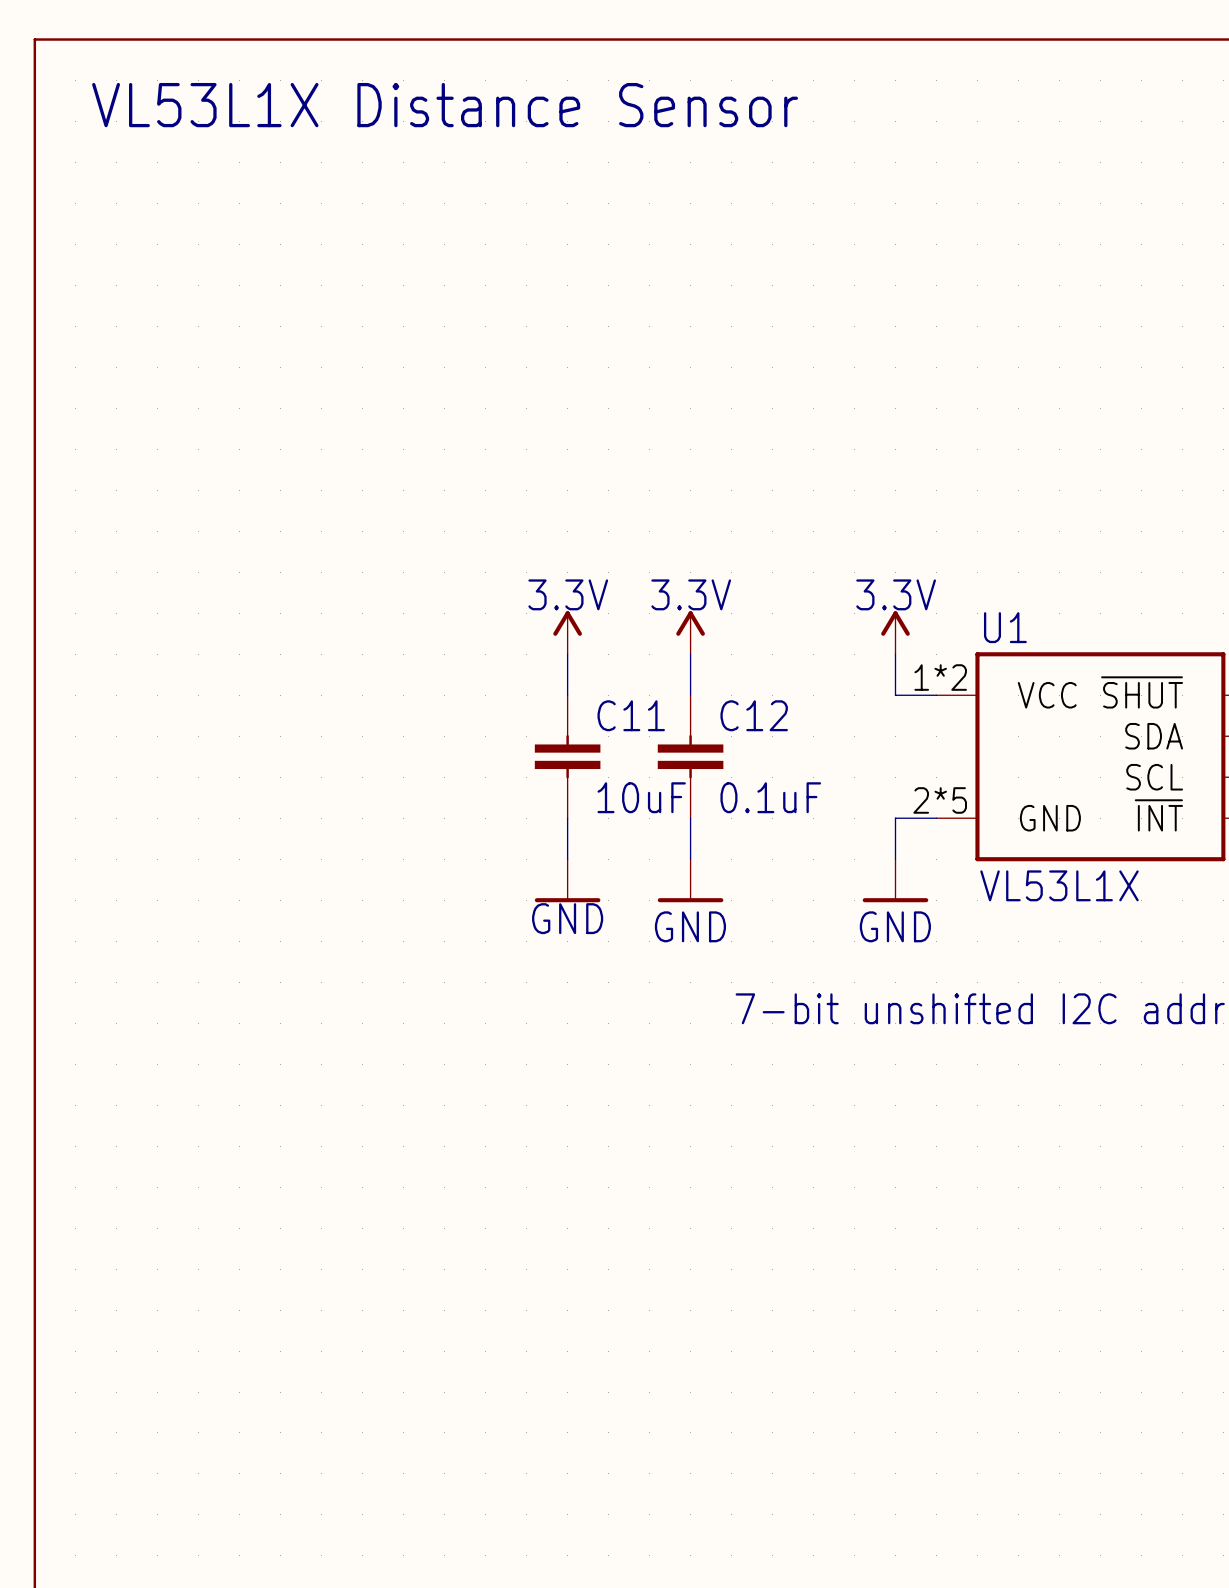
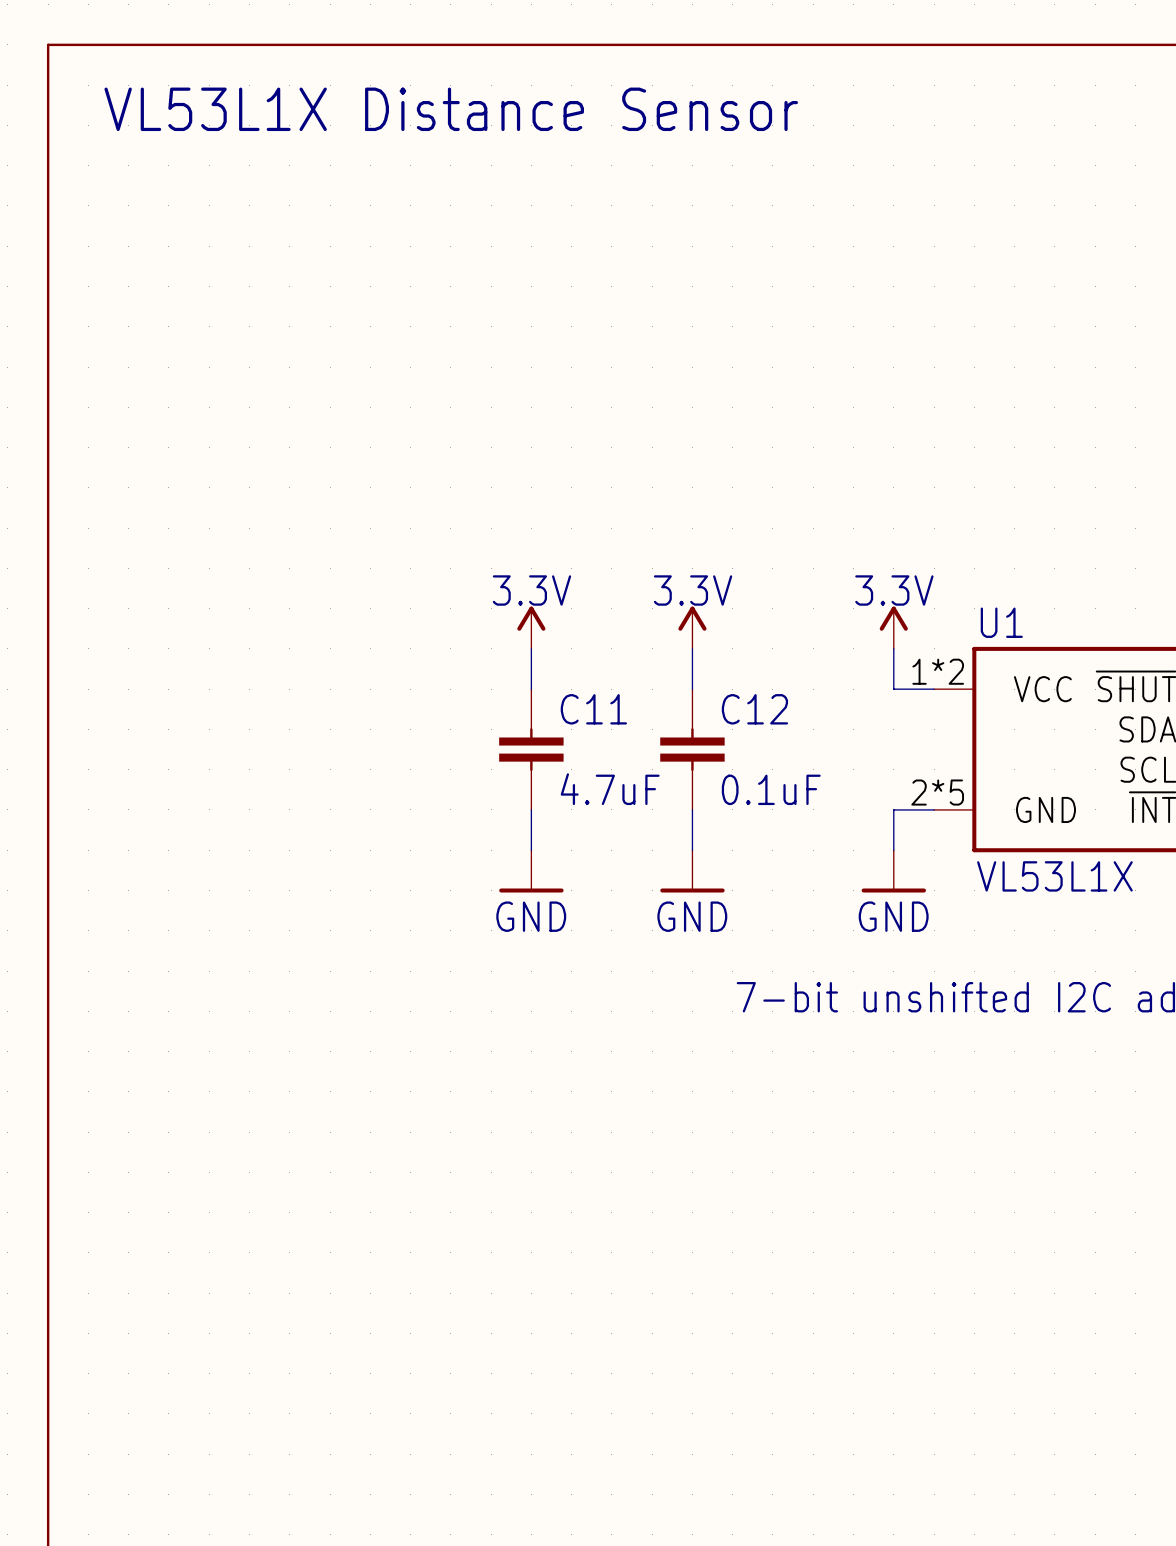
power symbol position: 3.3V (567, 632) -> 3.3V (531, 627)
wire: (567, 654) (567, 695) -> (531, 648) (531, 689)
C11 position: (567, 756) -> (531, 749)
C11 value: 10uF (641, 797) -> 4.7uF (610, 789)
wire: (567, 818) (567, 859) -> (531, 809) (531, 850)
power symbol position: GND (567, 880) -> GND (531, 871)
power symbol text position: GND (567, 918) -> GND (531, 916)

